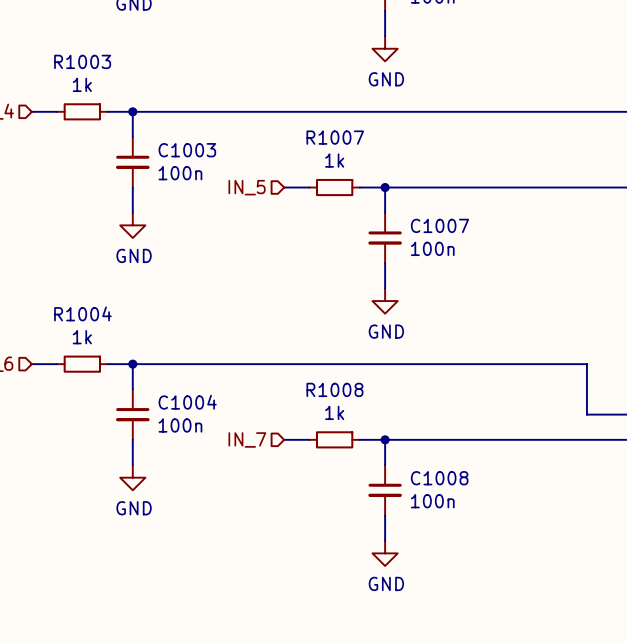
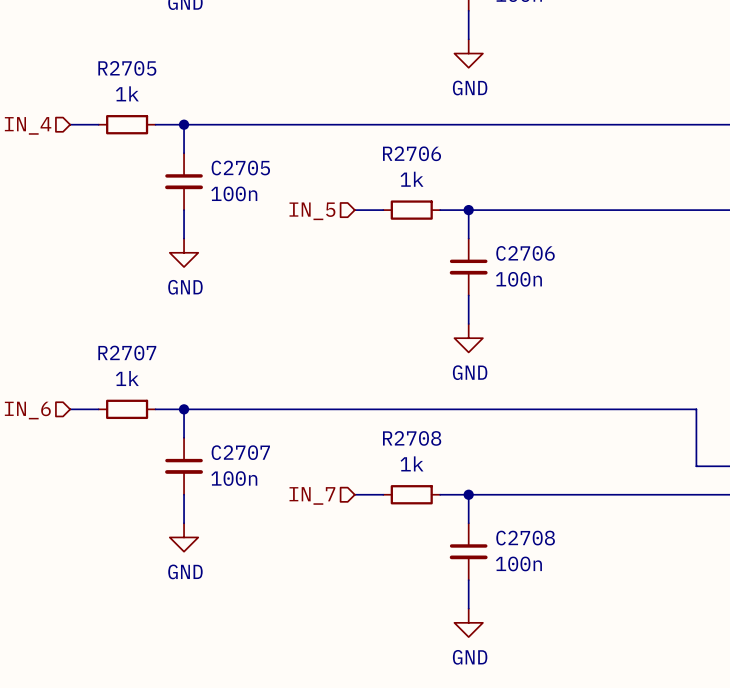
R1003 name: R1003 (82, 61) -> R2705 (127, 68)
R1007 name: R1007 (335, 137) -> R2706 (412, 153)
C1003 name: C1003 (187, 150) -> C2705 (240, 168)
C1007 name: C1007 (439, 225) -> C2706 (525, 253)
R1004 name: R1004 (82, 313) -> R2707 (127, 353)
R1008 name: R1008 (334, 389) -> R2708 (412, 438)
C1004 name: C1004 (187, 402) -> C2707 (240, 452)
C1008 name: C1008 (439, 478) -> C2708 (525, 538)

